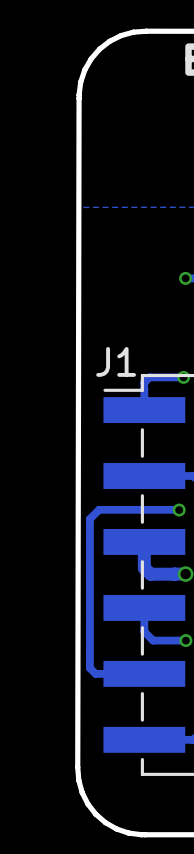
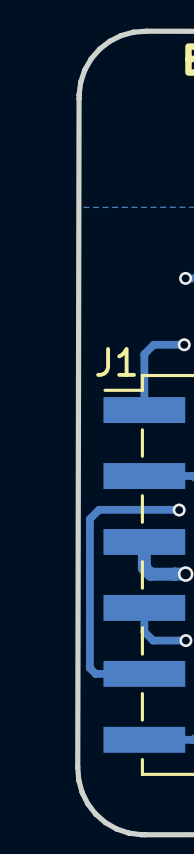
via: none -> (184, 344)
track: (183, 377) (149, 377) (144, 382) -> (184, 344) (153, 344) (144, 354) (144, 382)
via: (183, 377) -> none

